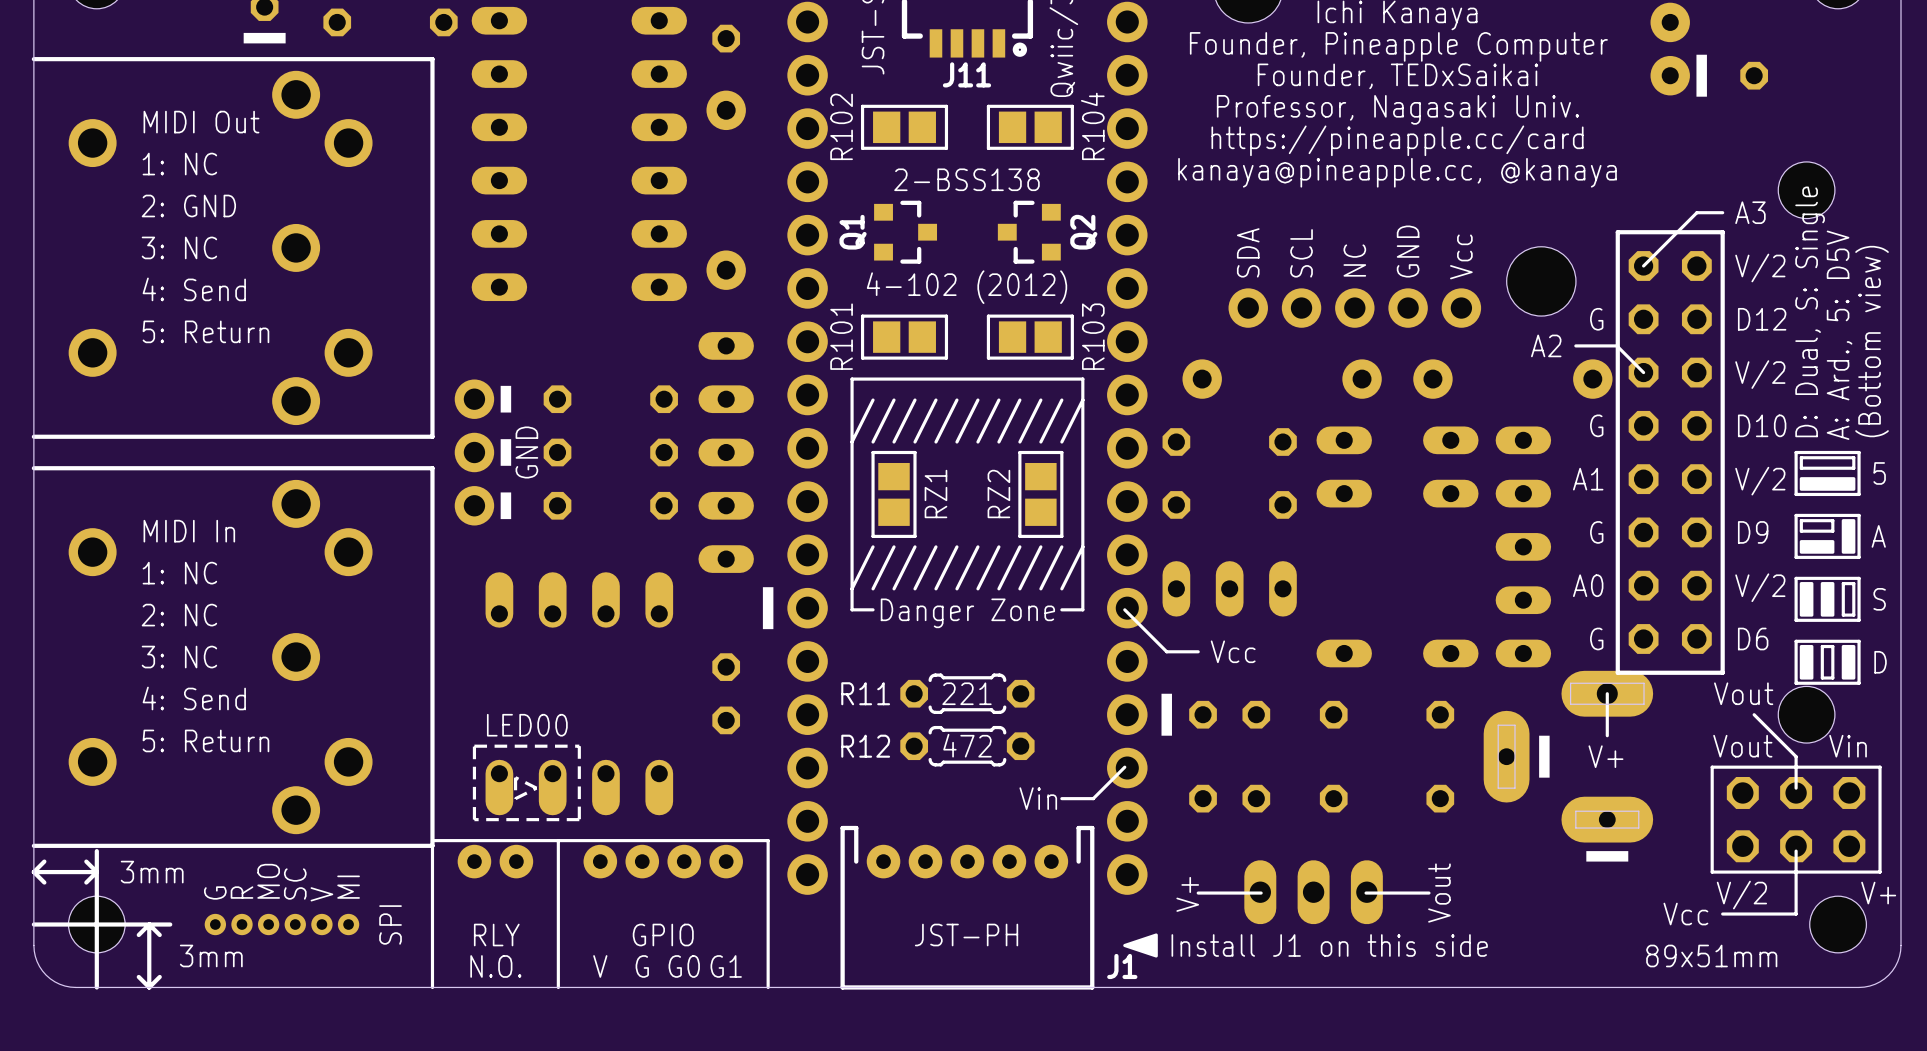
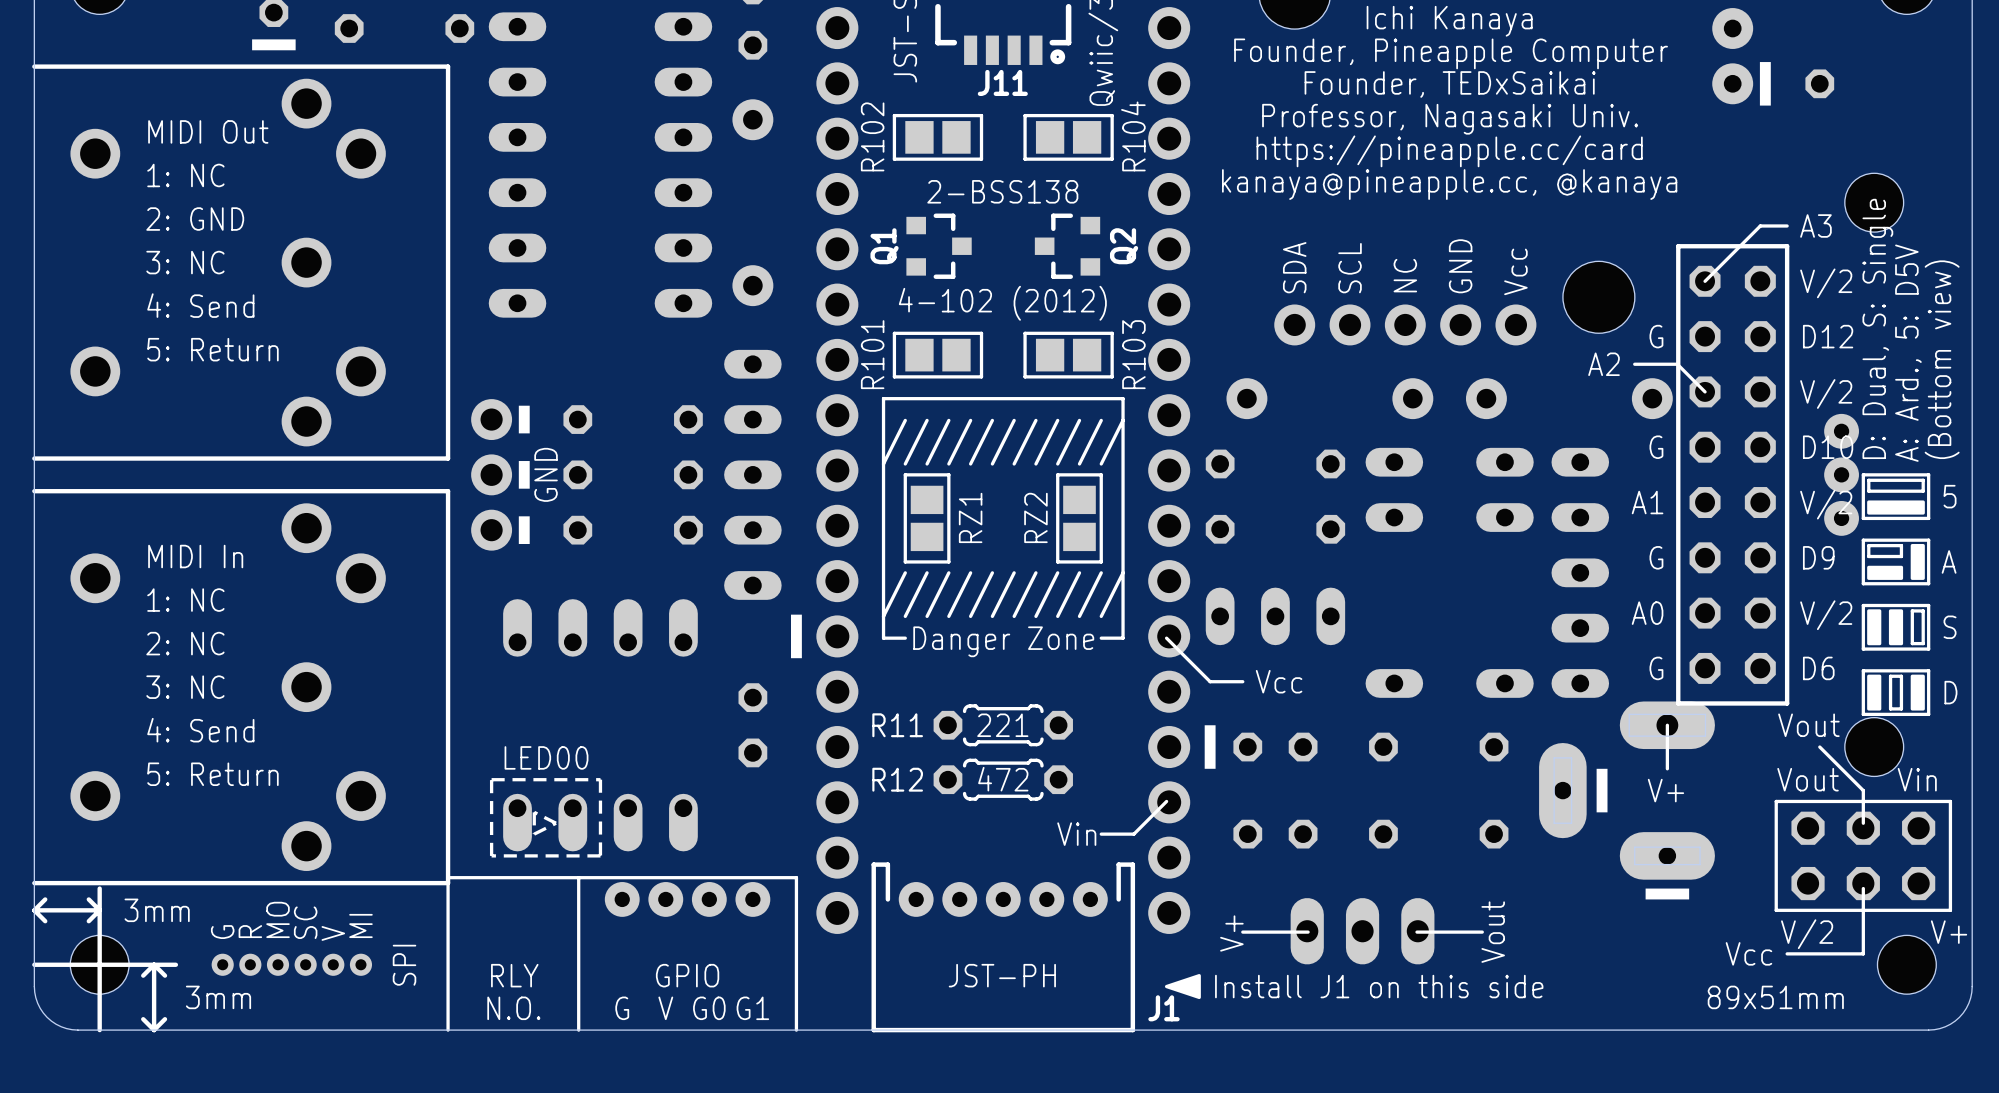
part: none -> (1841, 474)
part: (495, 861) -> none
text: V (600, 966) -> G (622, 1008)
text: G (642, 966) -> V (665, 1008)

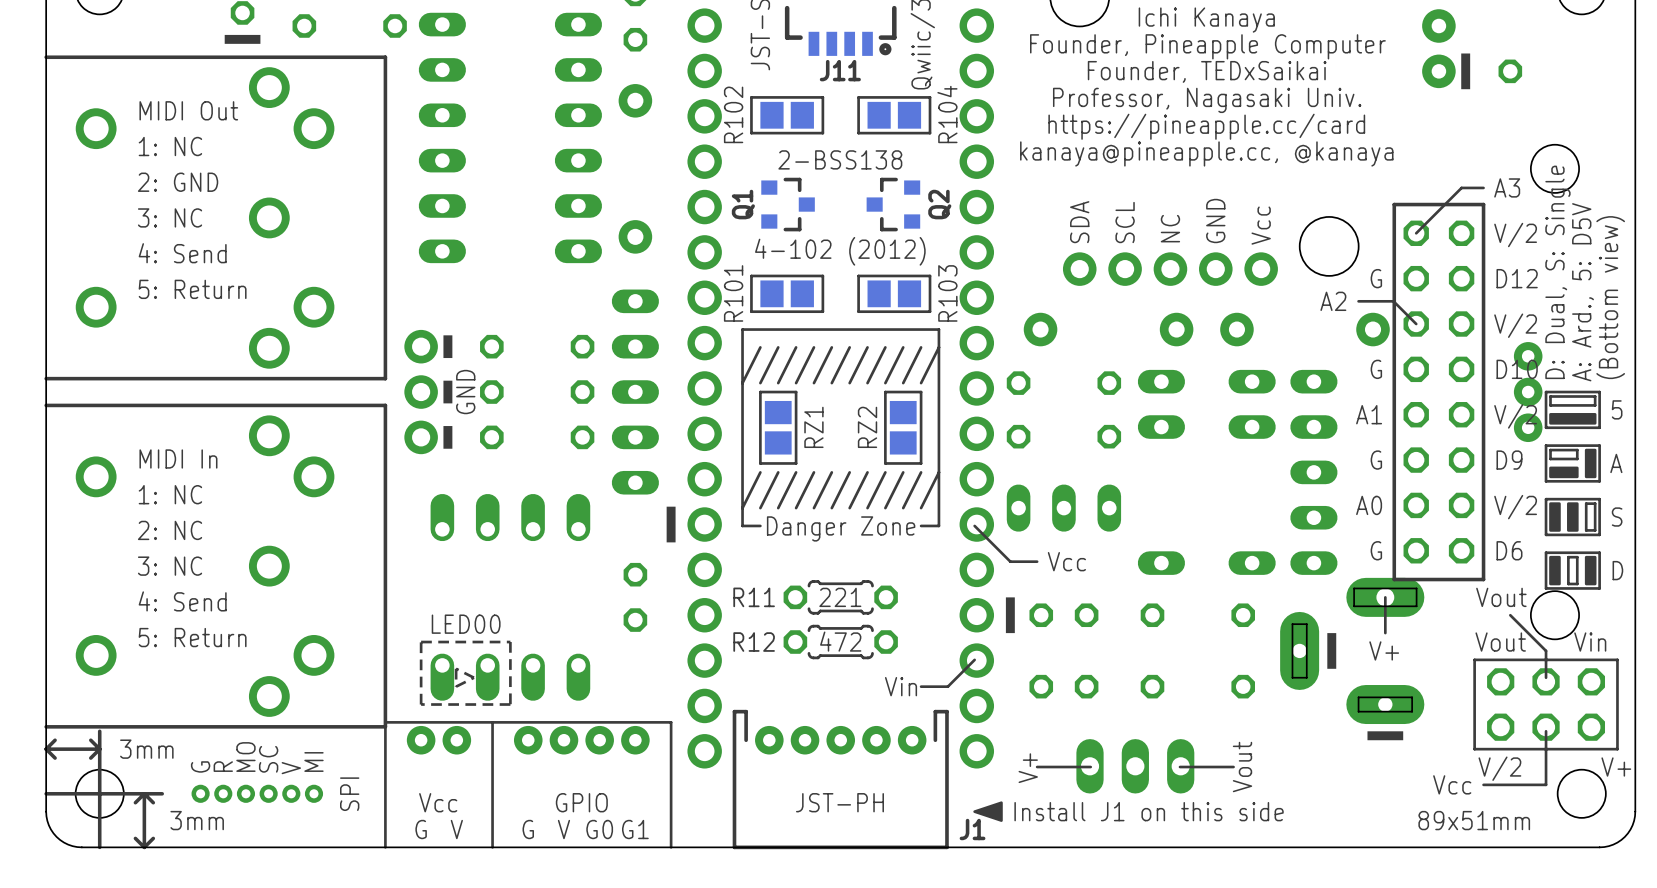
part: none -> (438, 740)
text: RLY (514, 975) -> Vcc (438, 802)
text: none -> G (421, 829)
text: N.O. (513, 1008) -> none
text: none -> V (456, 829)

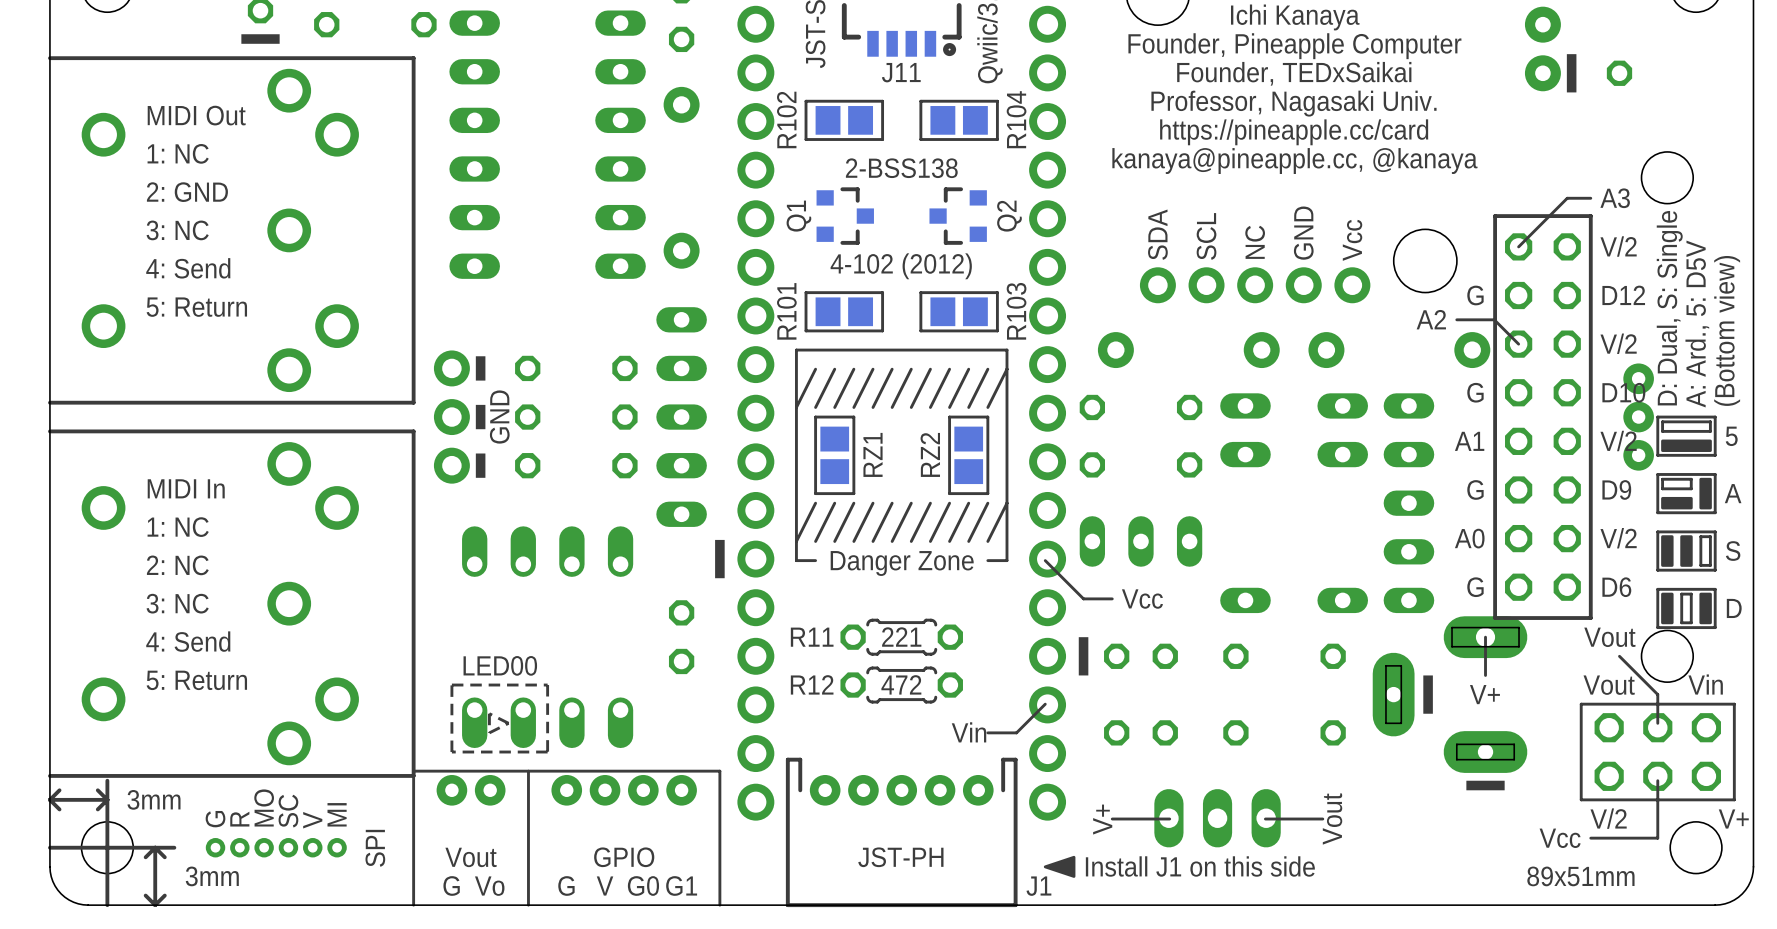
text: Vcc (438, 802) -> Vout (471, 857)
text: V (456, 829) -> Vo (489, 886)

